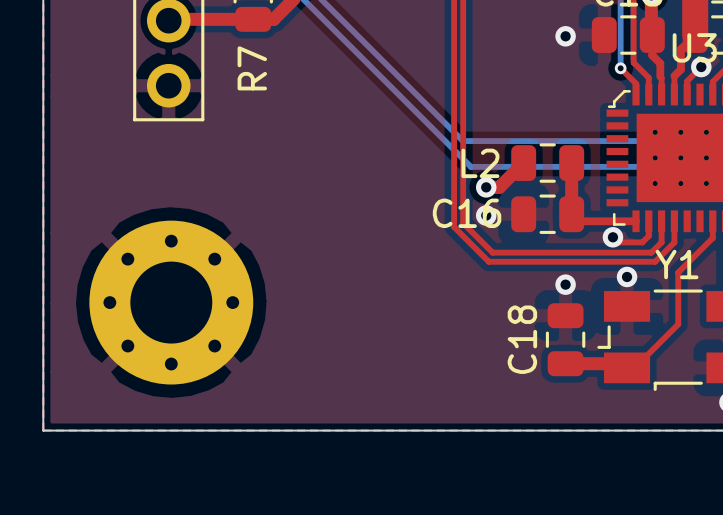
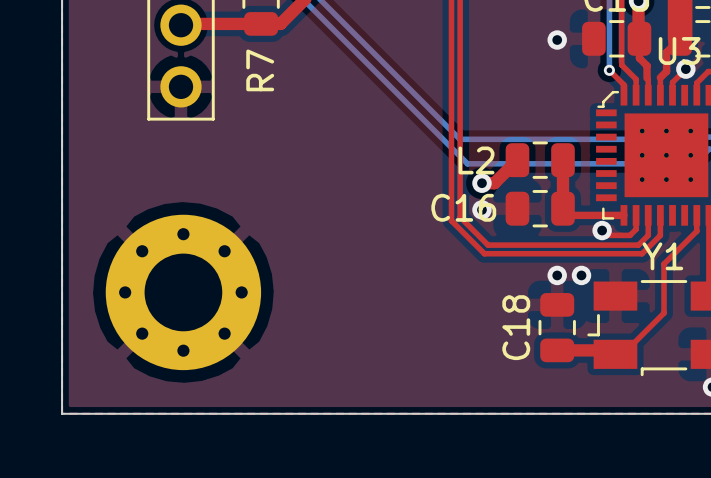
via position: (627, 276) -> (581, 275)

